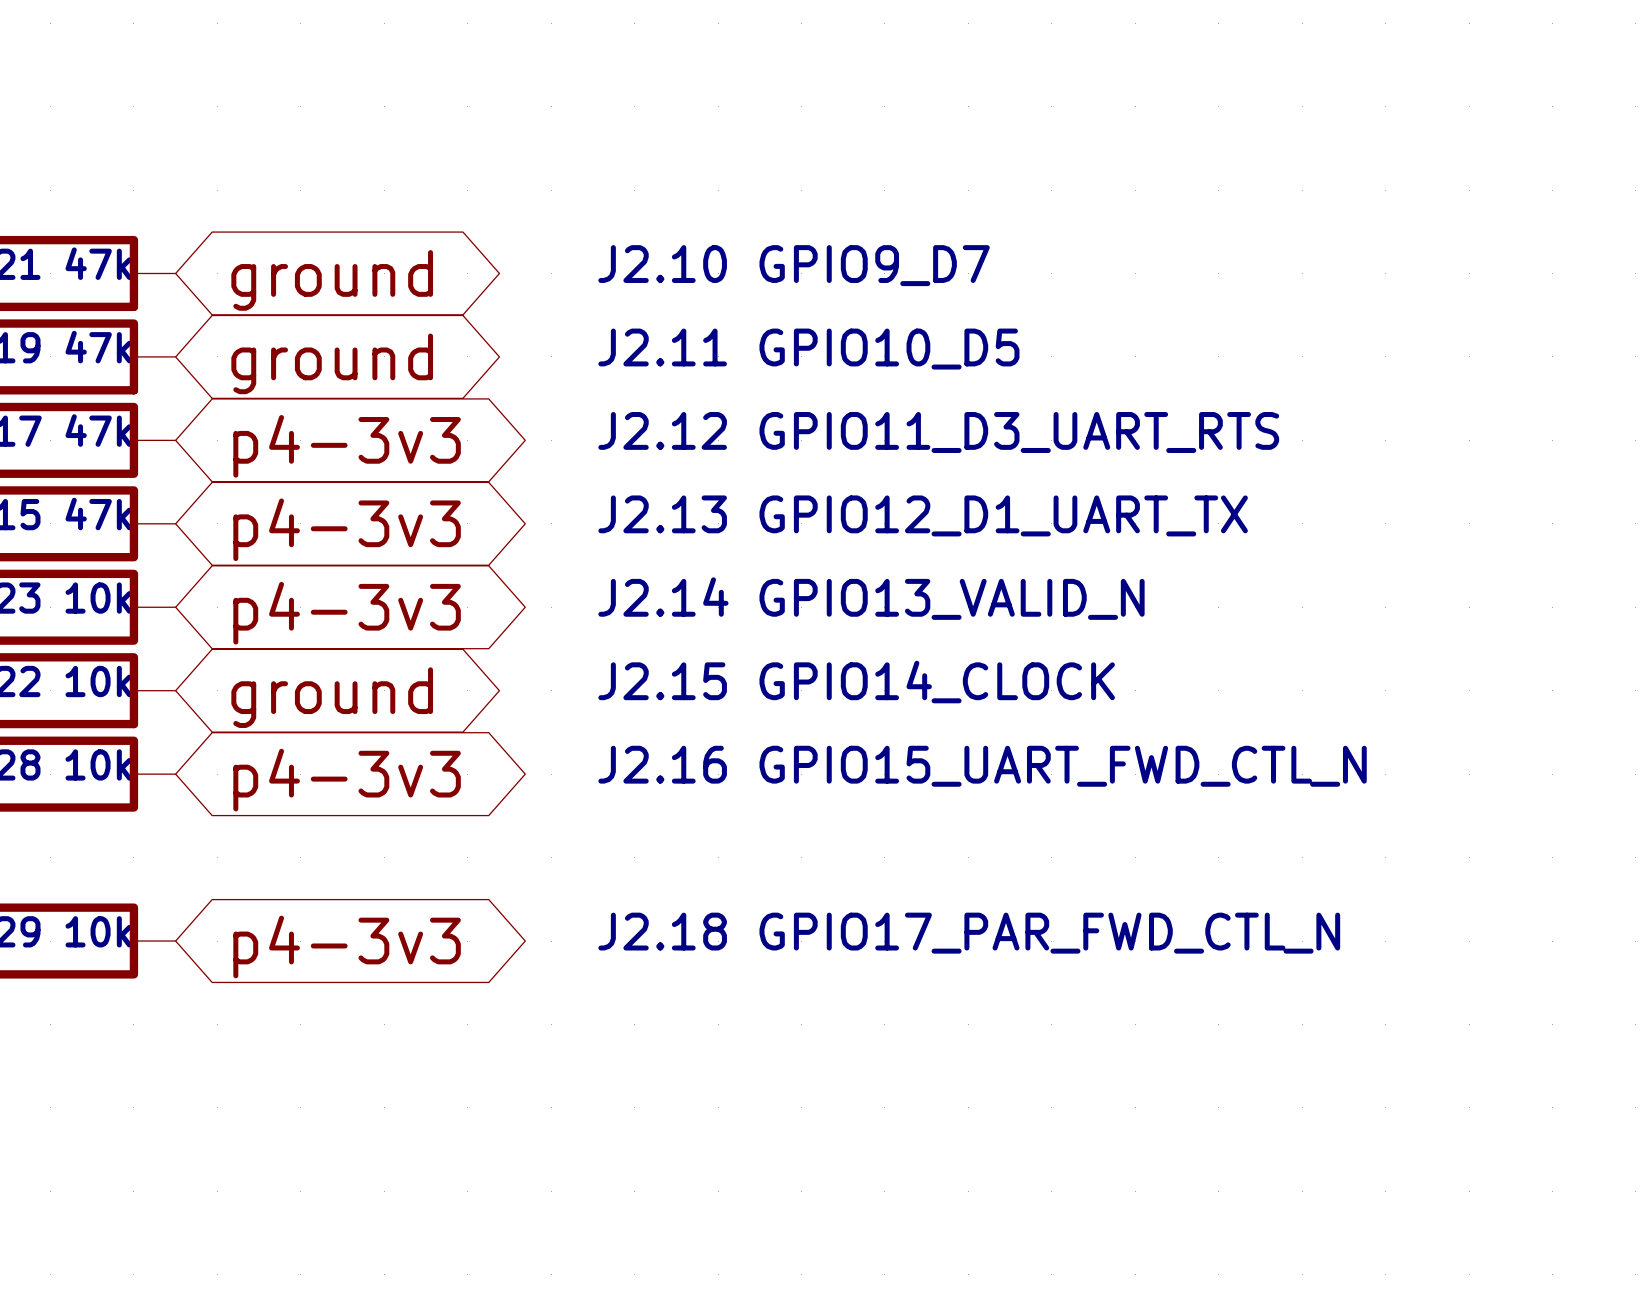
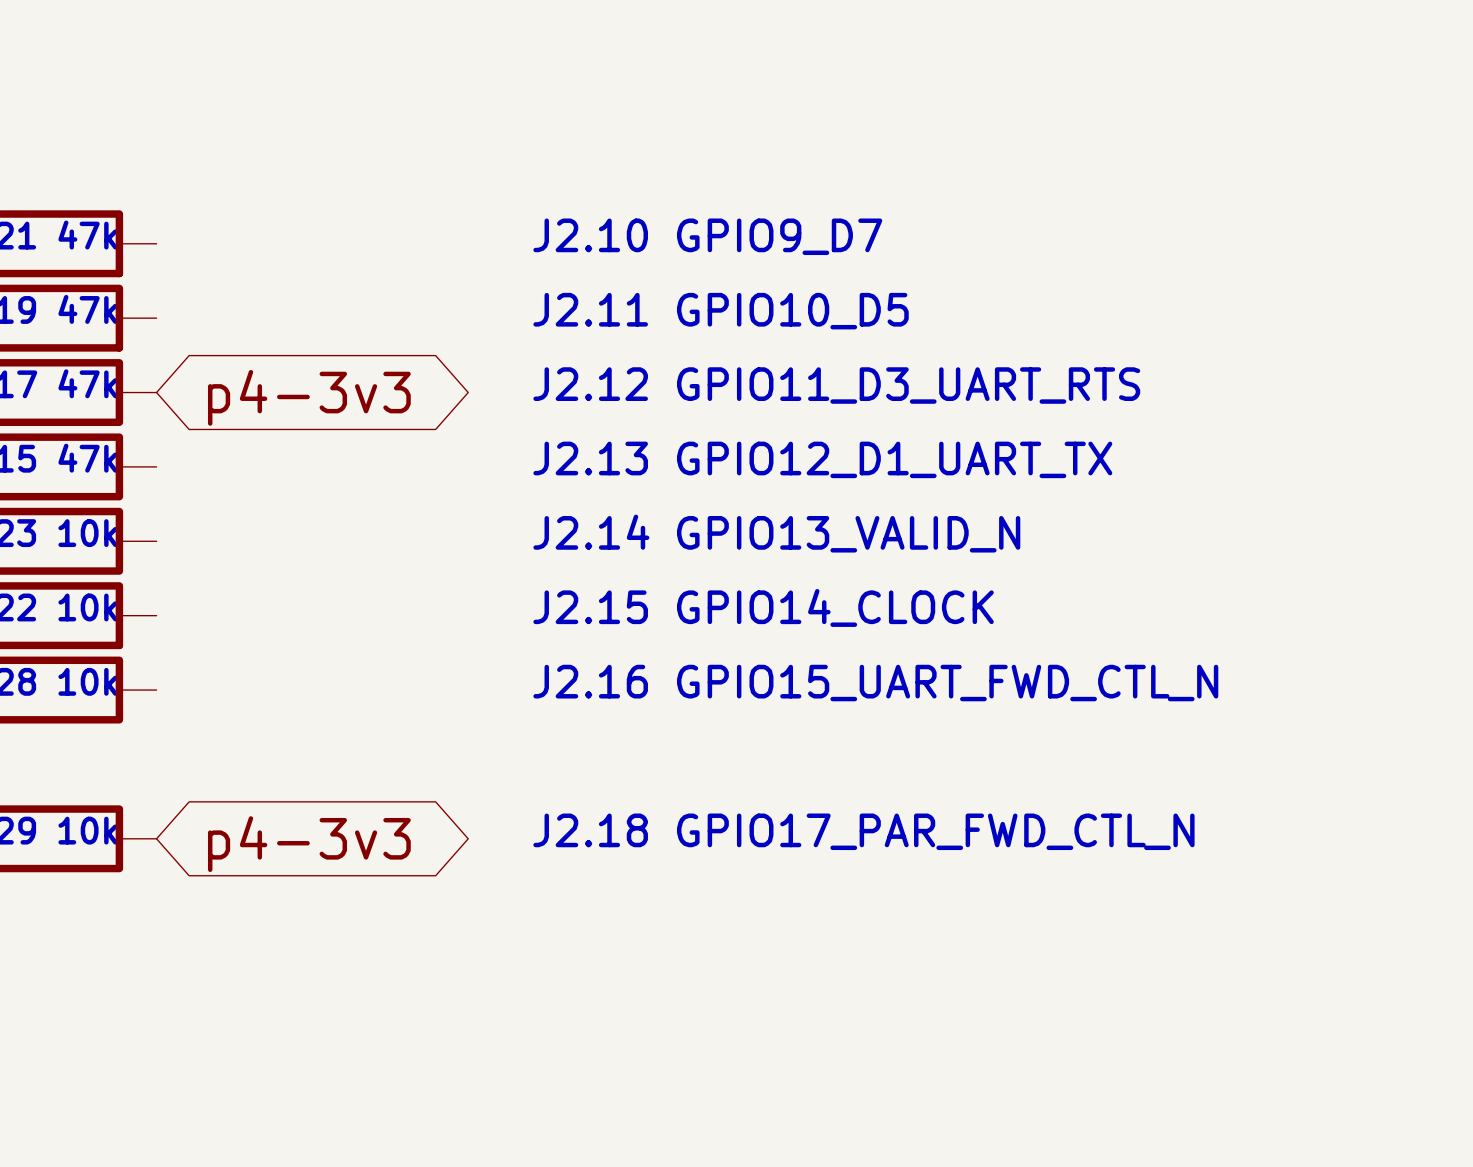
global label: ground (332, 280) -> none
global label: ground (332, 363) -> none
global label: p4-3v3 (347, 529) -> none
global label: p4-3v3 (347, 613) -> none
global label: ground (332, 697) -> none
global label: p4-3v3 (347, 780) -> none

